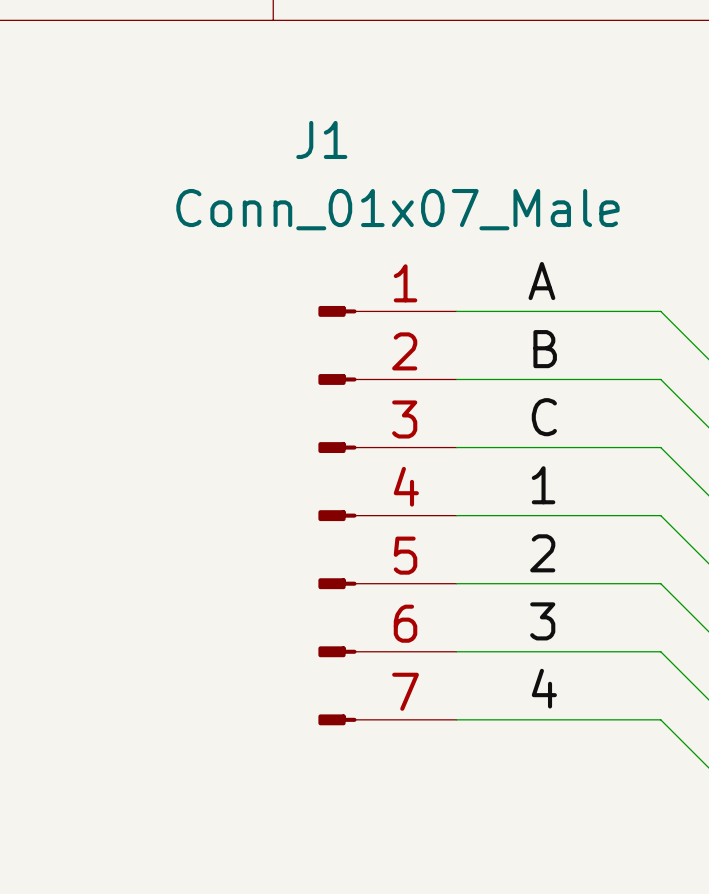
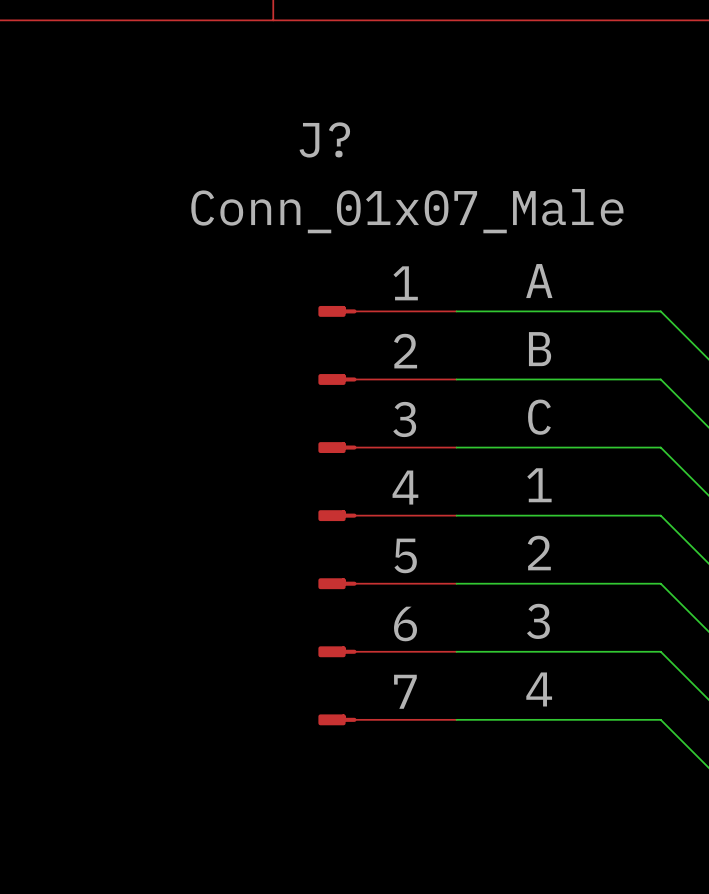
J1 name: J1 (321, 139) -> J? (324, 139)

